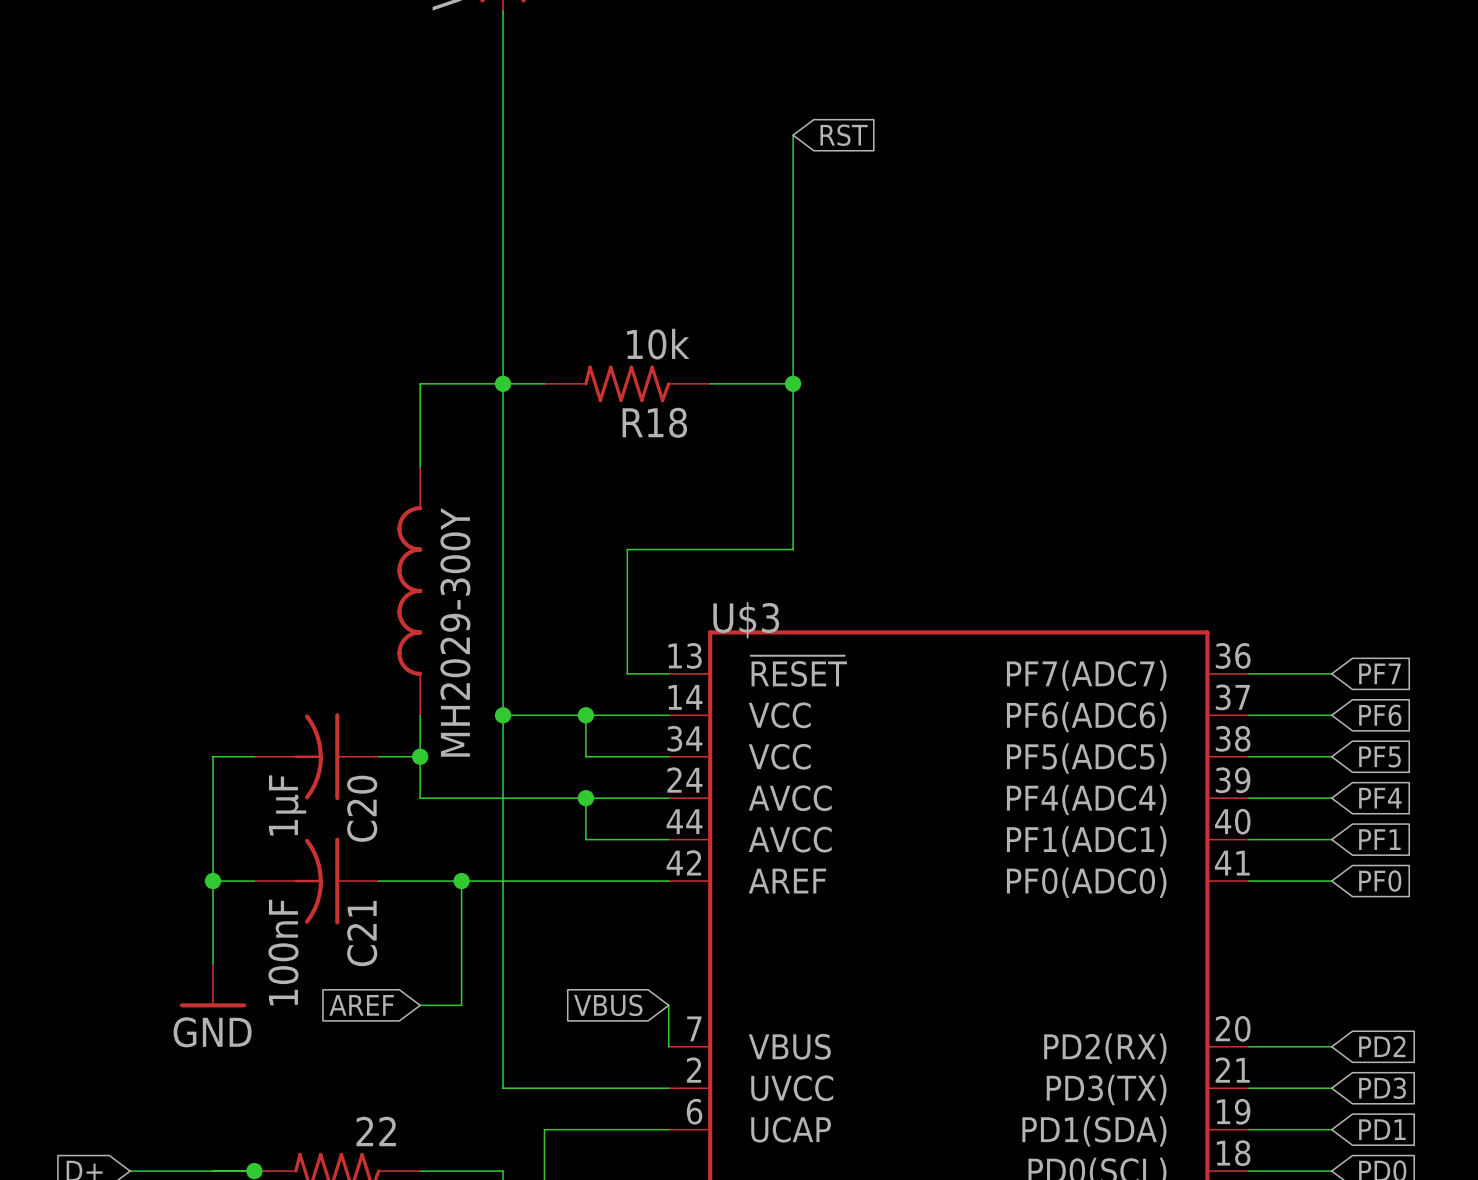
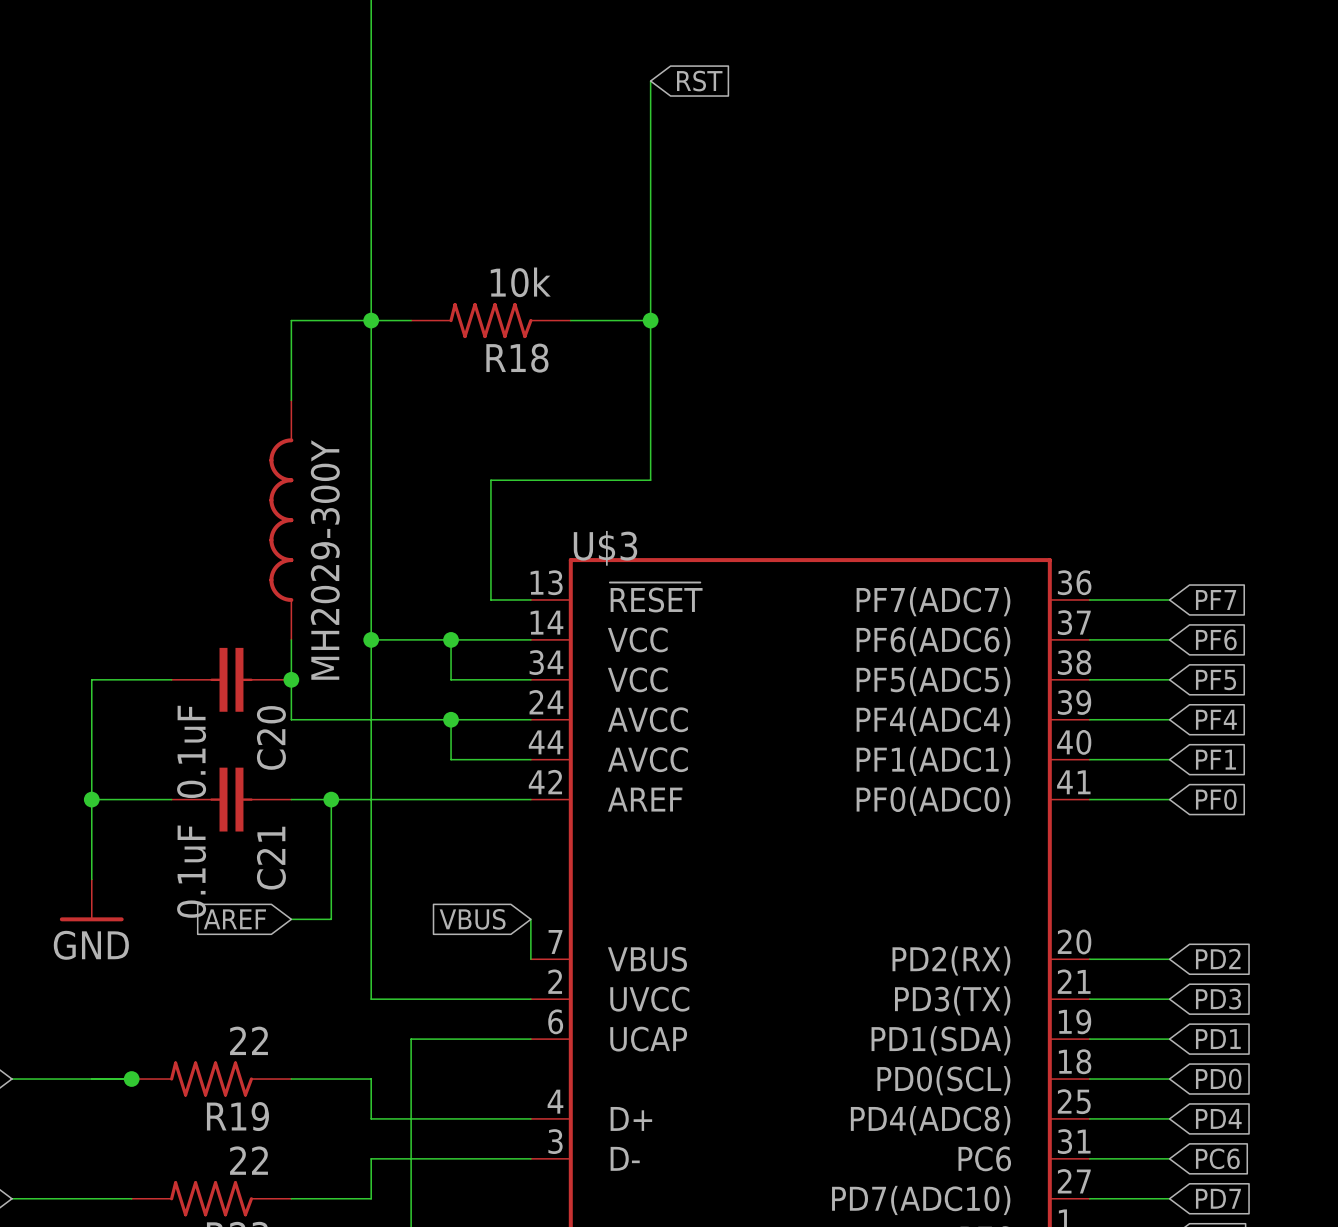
C20 symbol: [254, 713, 379, 801] -> [171, 647, 292, 712]
C20 value: 1µF (287, 805) -> 0.1uF (191, 751)
C21 symbol: [254, 837, 379, 925] -> [171, 767, 292, 832]
C21 value: 100nF (283, 952) -> 0.1uF (191, 871)

